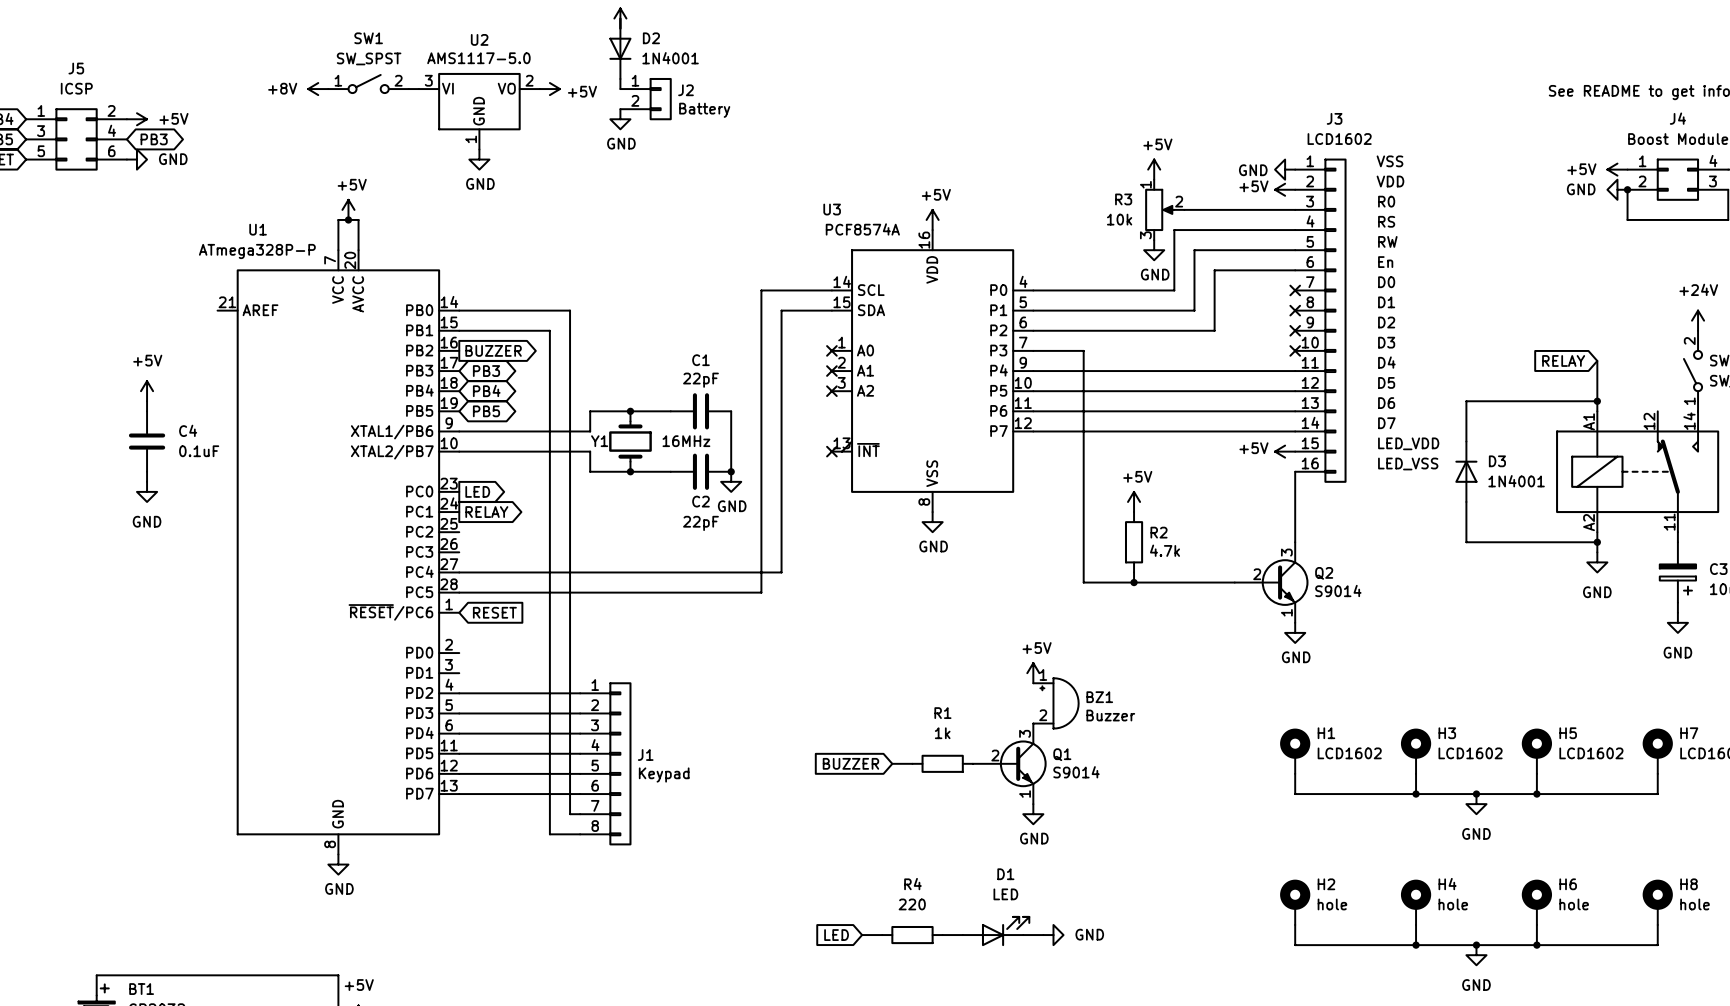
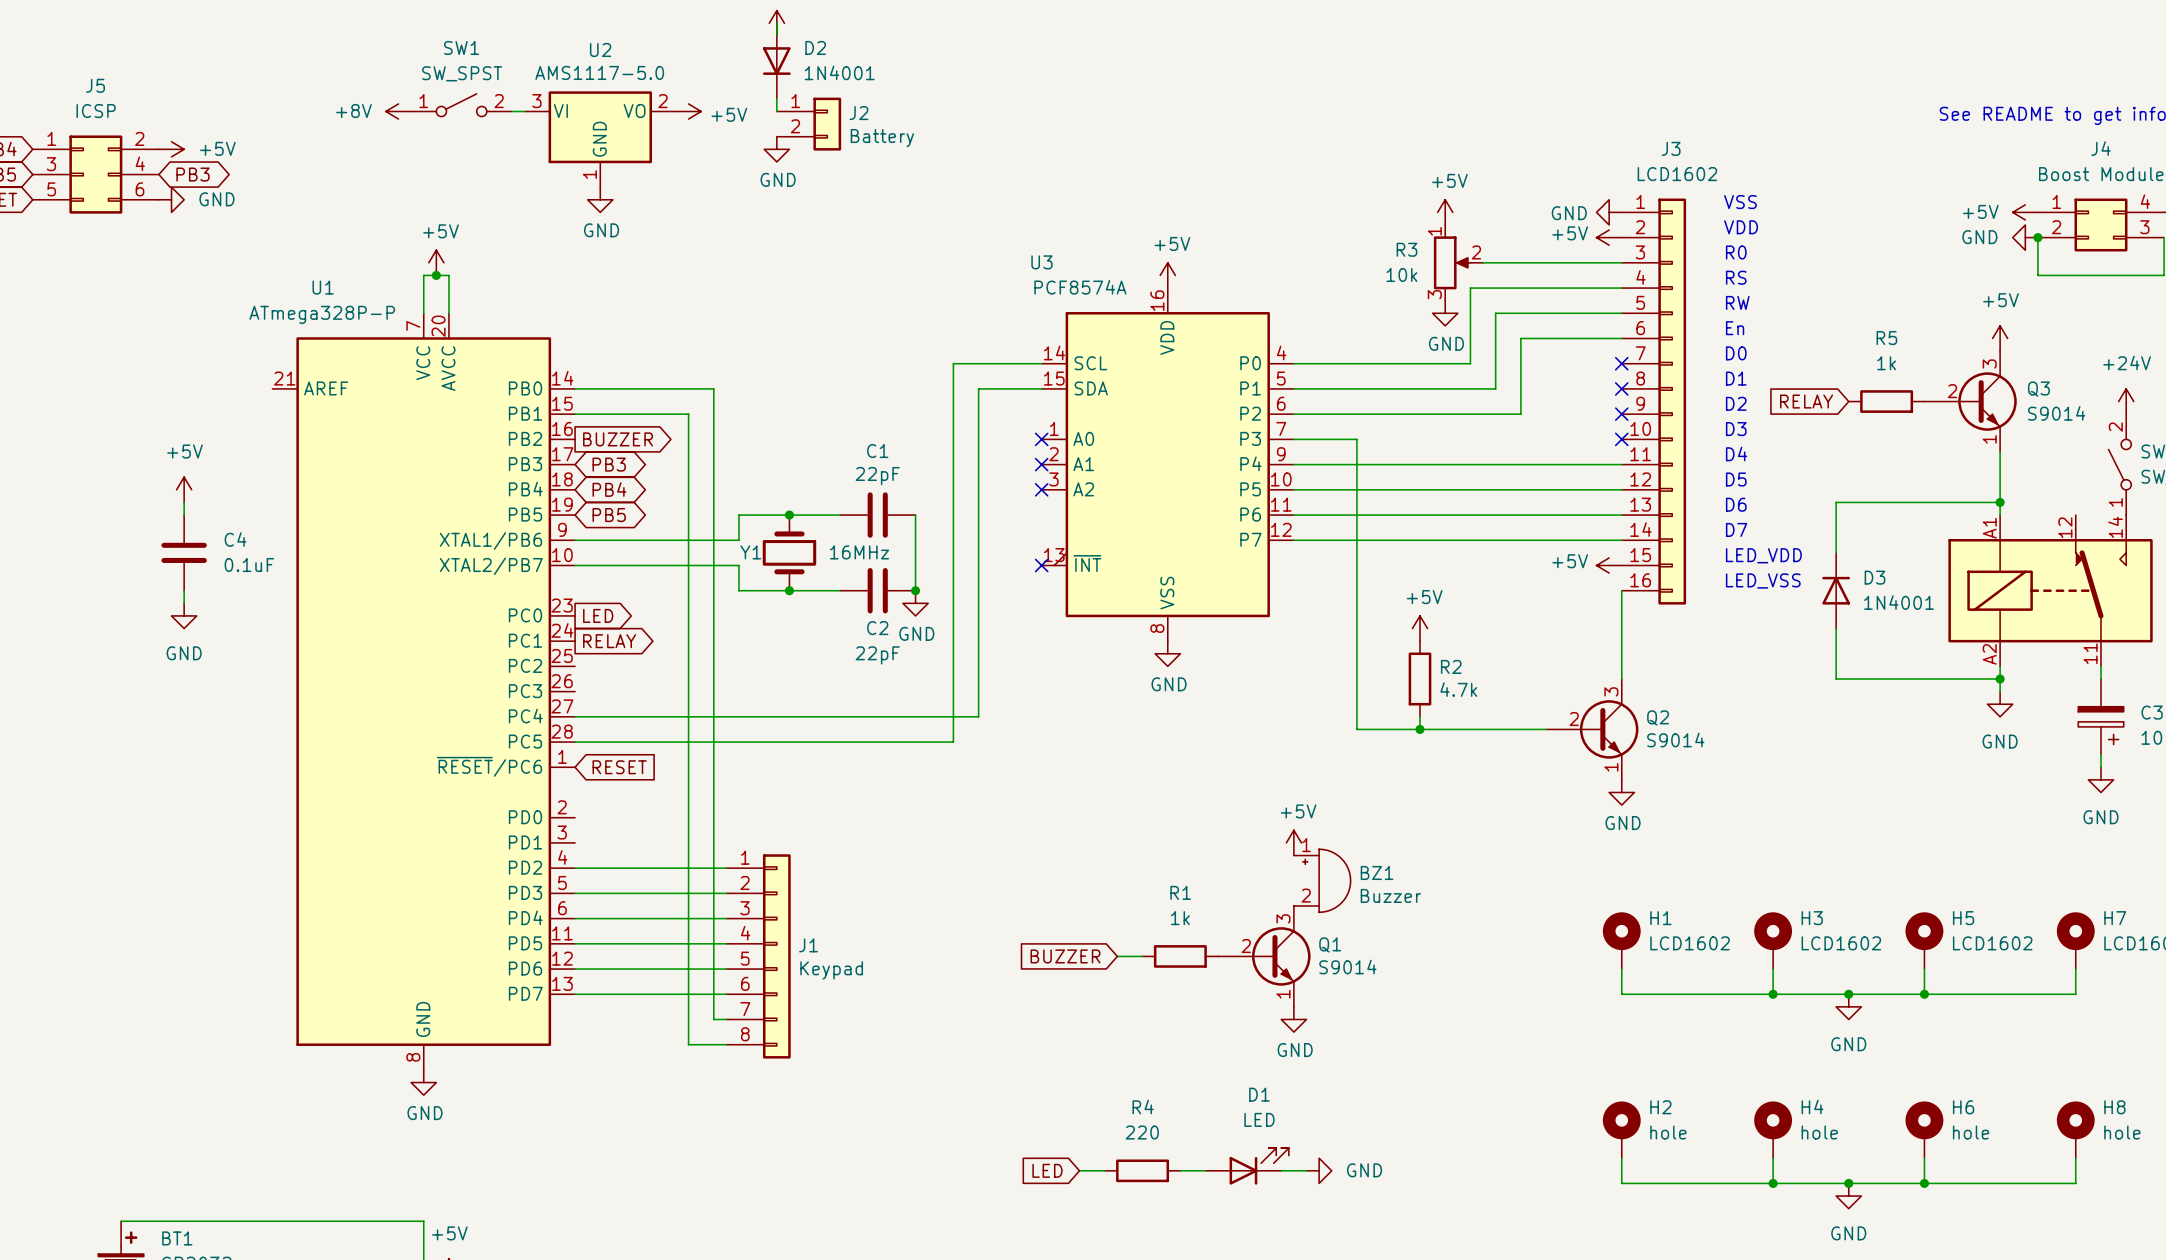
power symbol: none -> +5V (2000, 338)
R5: none -> 1k (1886, 401)
Q3: none -> S9014 (1970, 401)
global label position: RELAY (1563, 360) -> RELAY (1806, 401)

